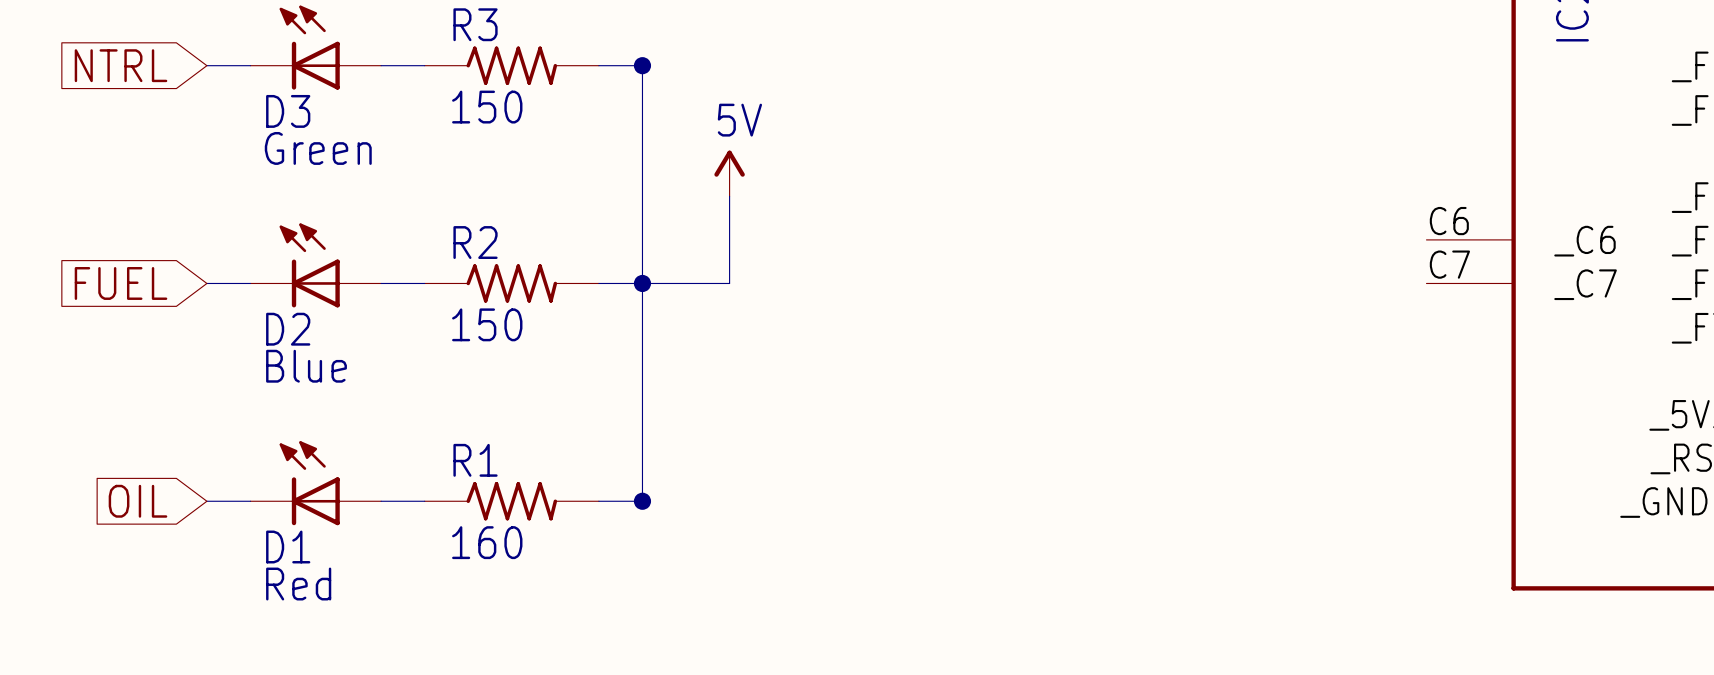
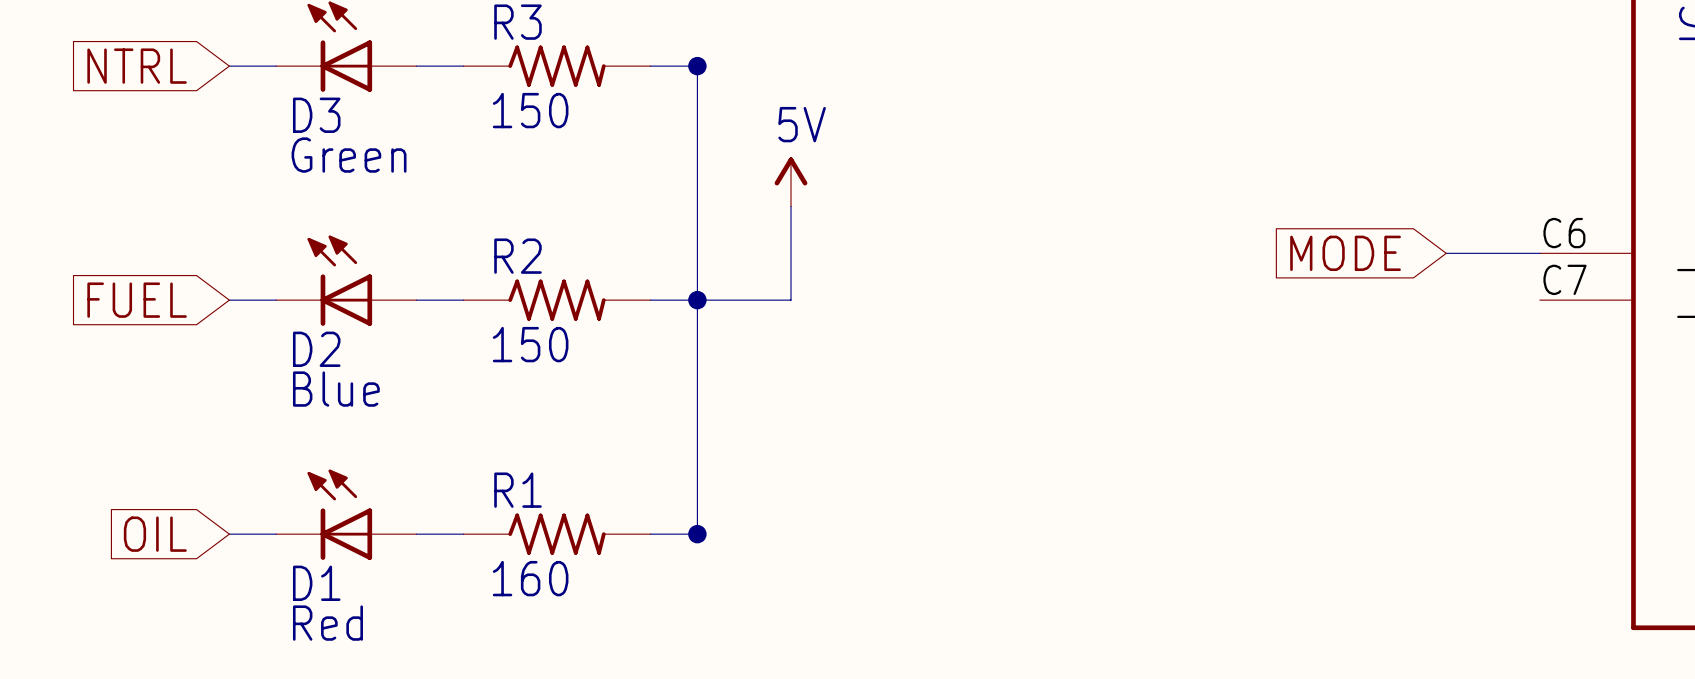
global label: none -> MODE (1345, 253)
wire: none -> (1446, 253) (1539, 253)

